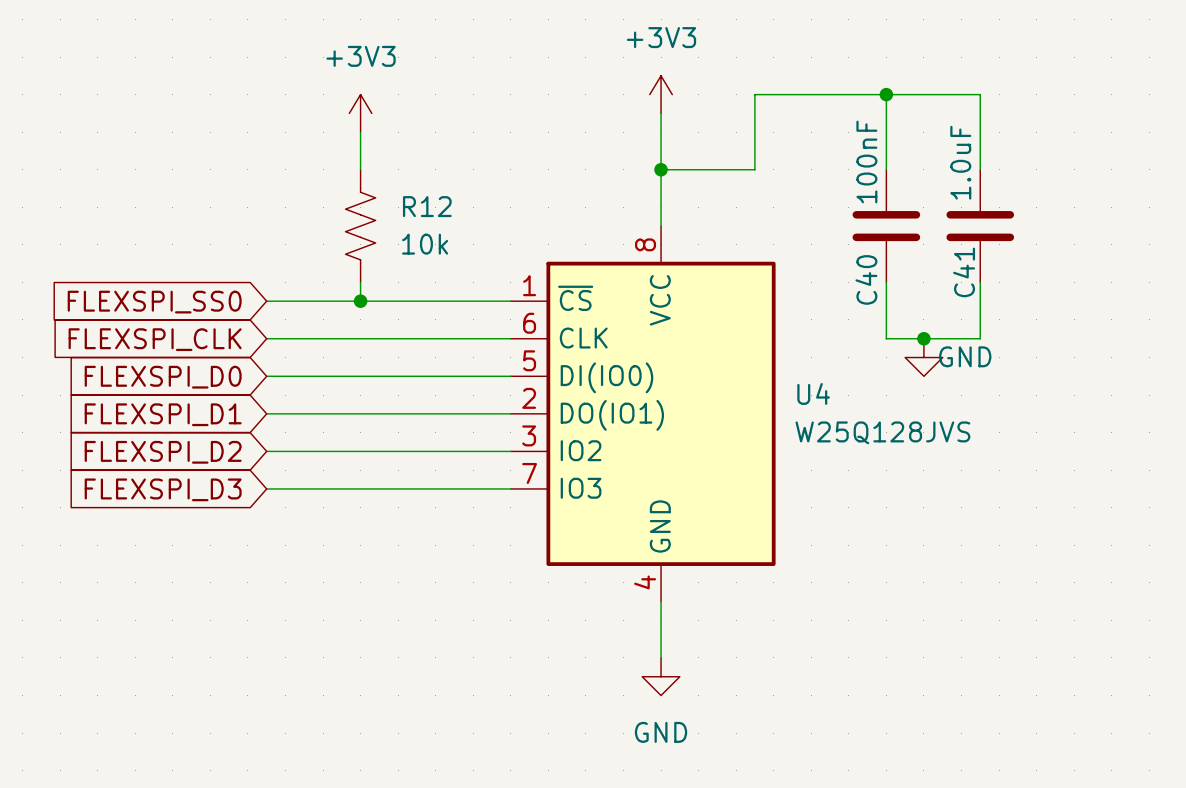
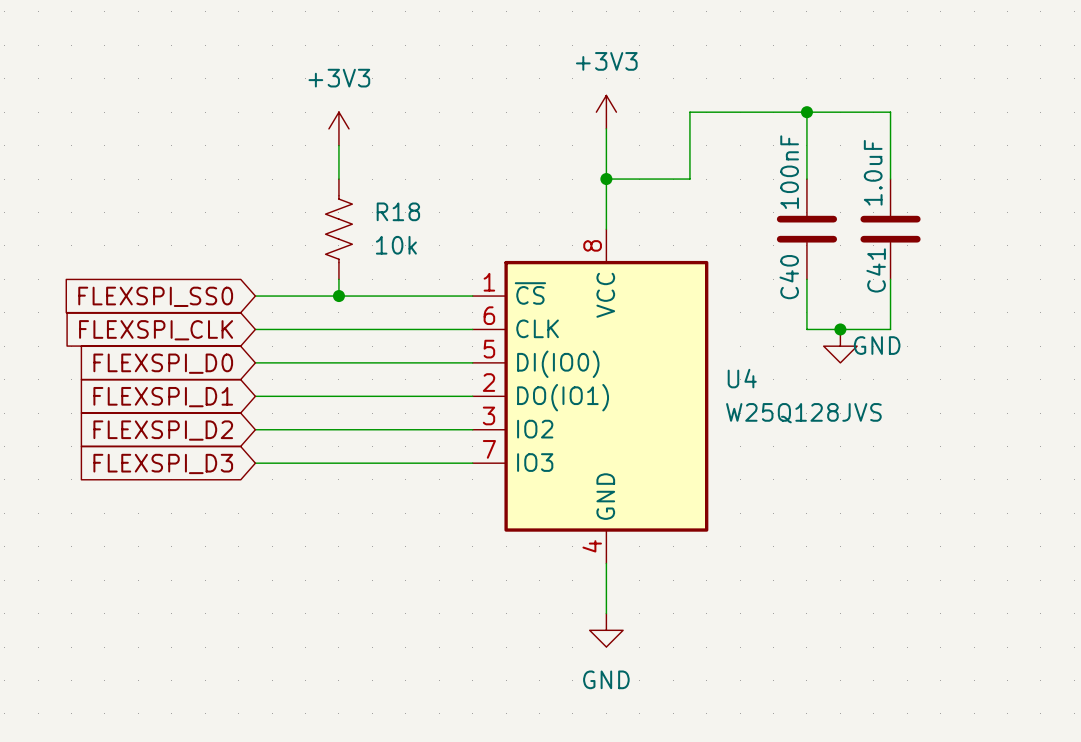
R12 name: R12 (427, 206) -> R18 (398, 211)

